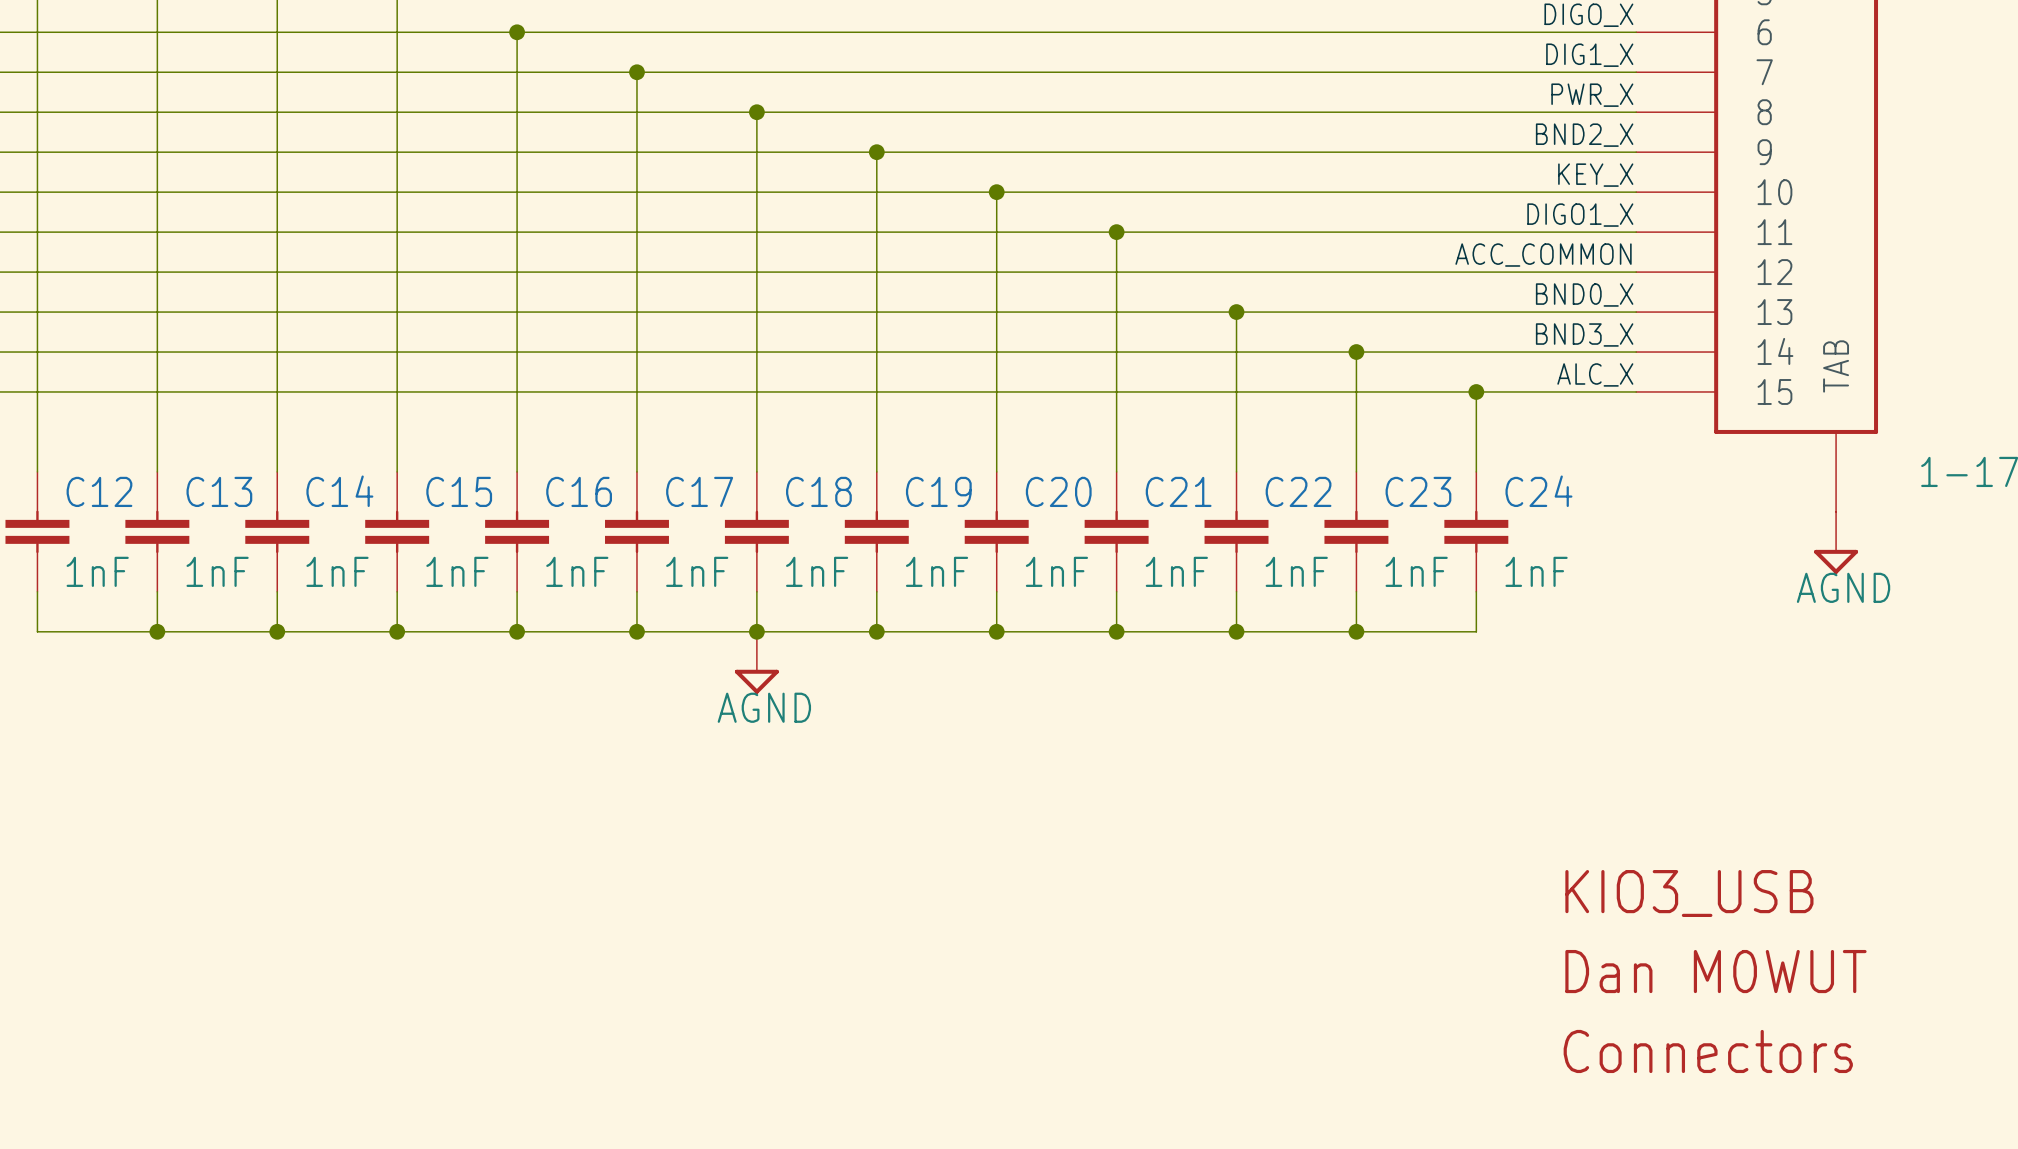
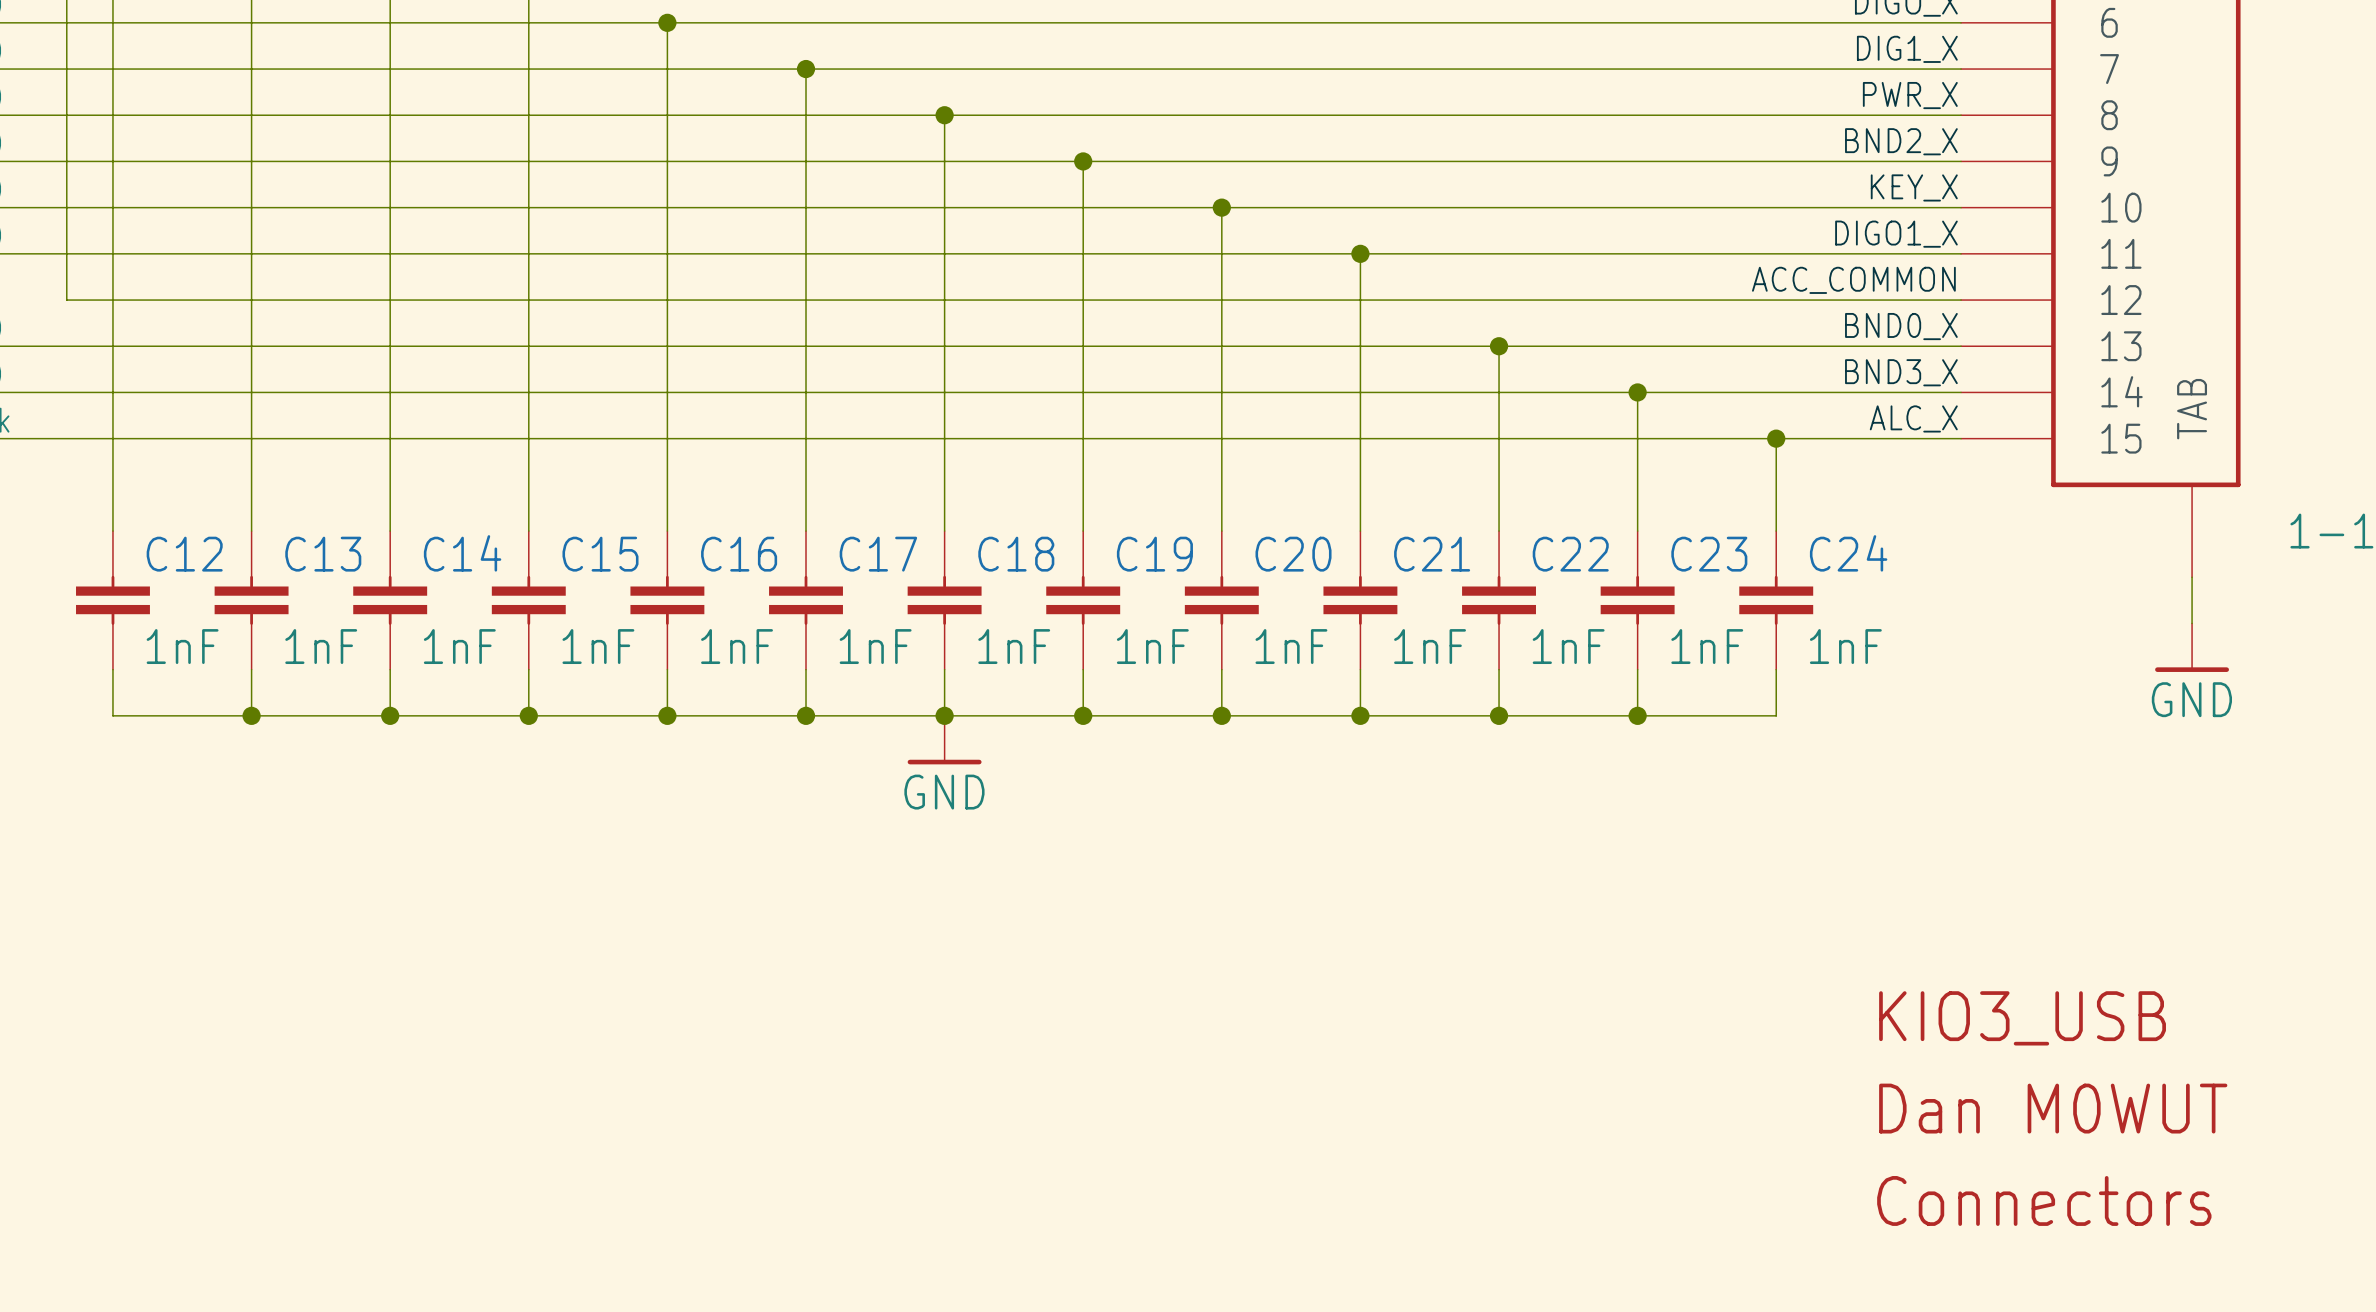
power symbol: AGND (1836, 542) -> none
power symbol: none -> GND (2192, 647)
power symbol: AGND (756, 662) -> GND (944, 740)

